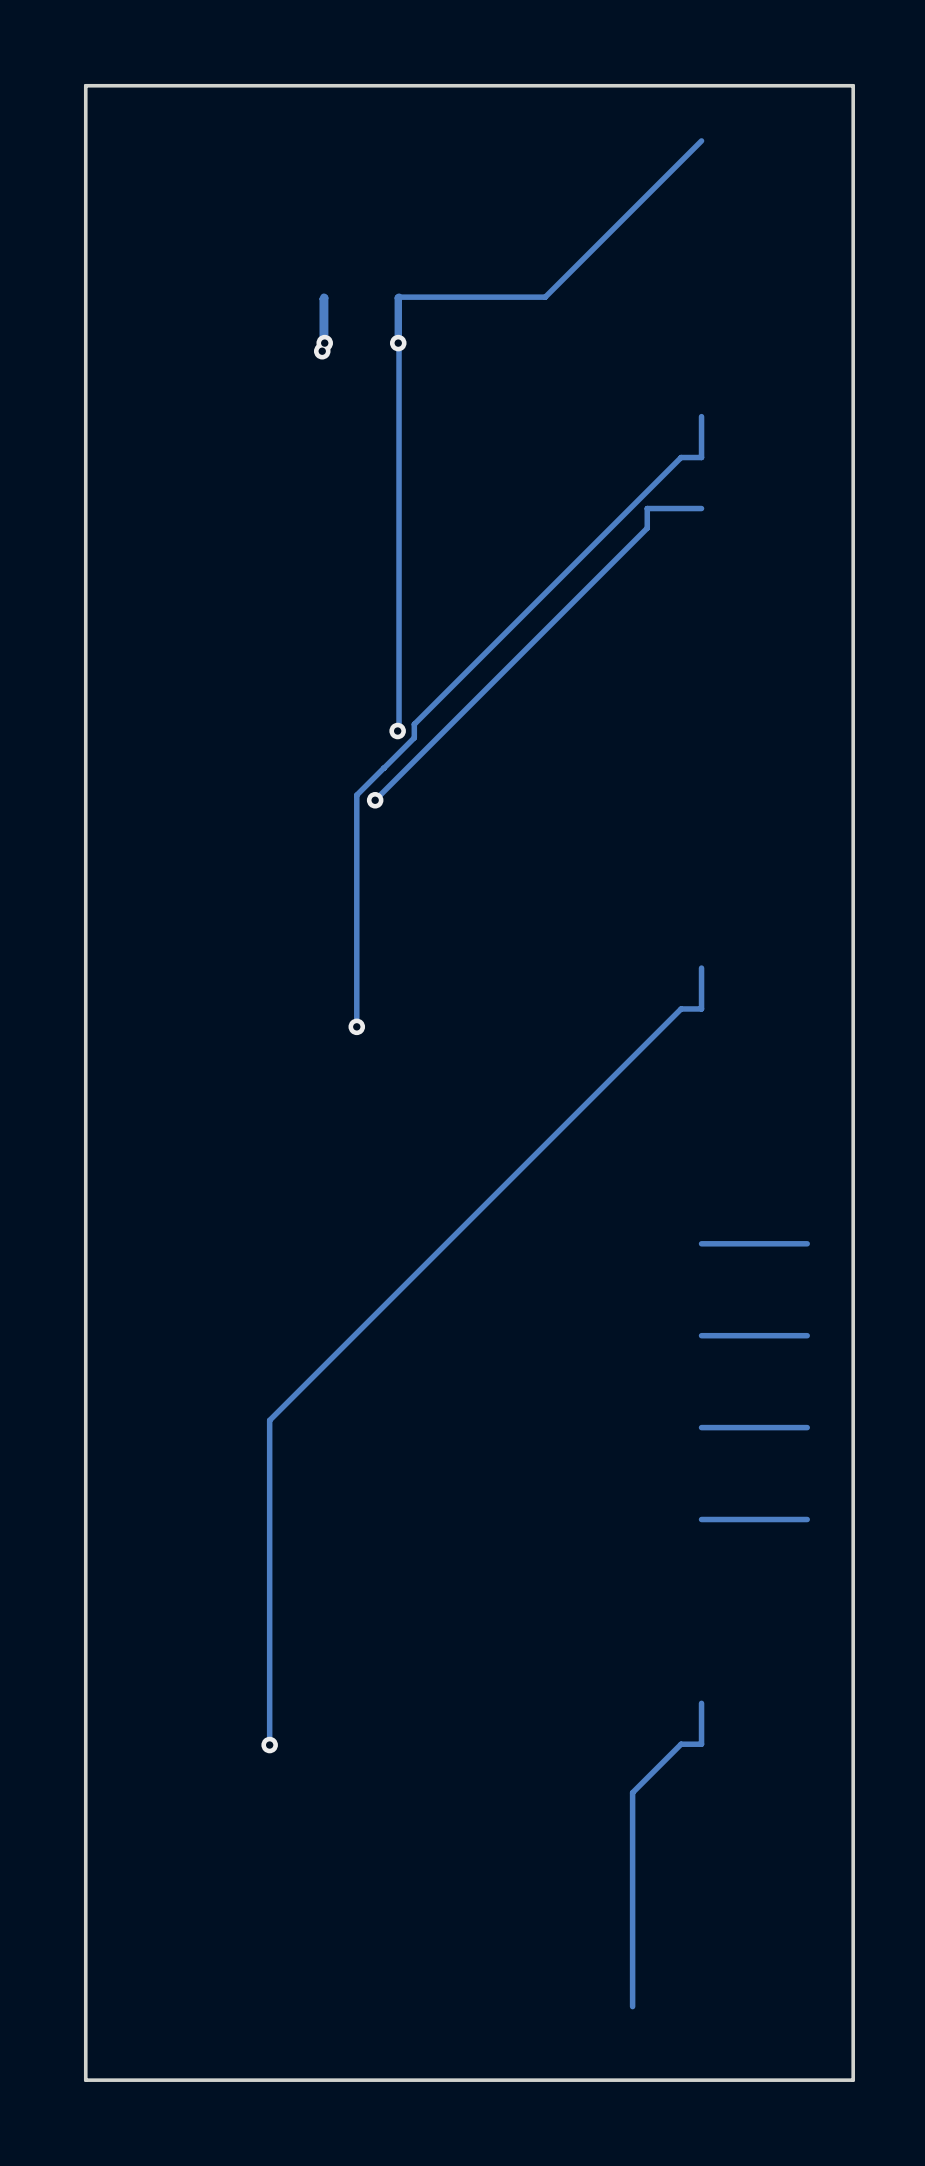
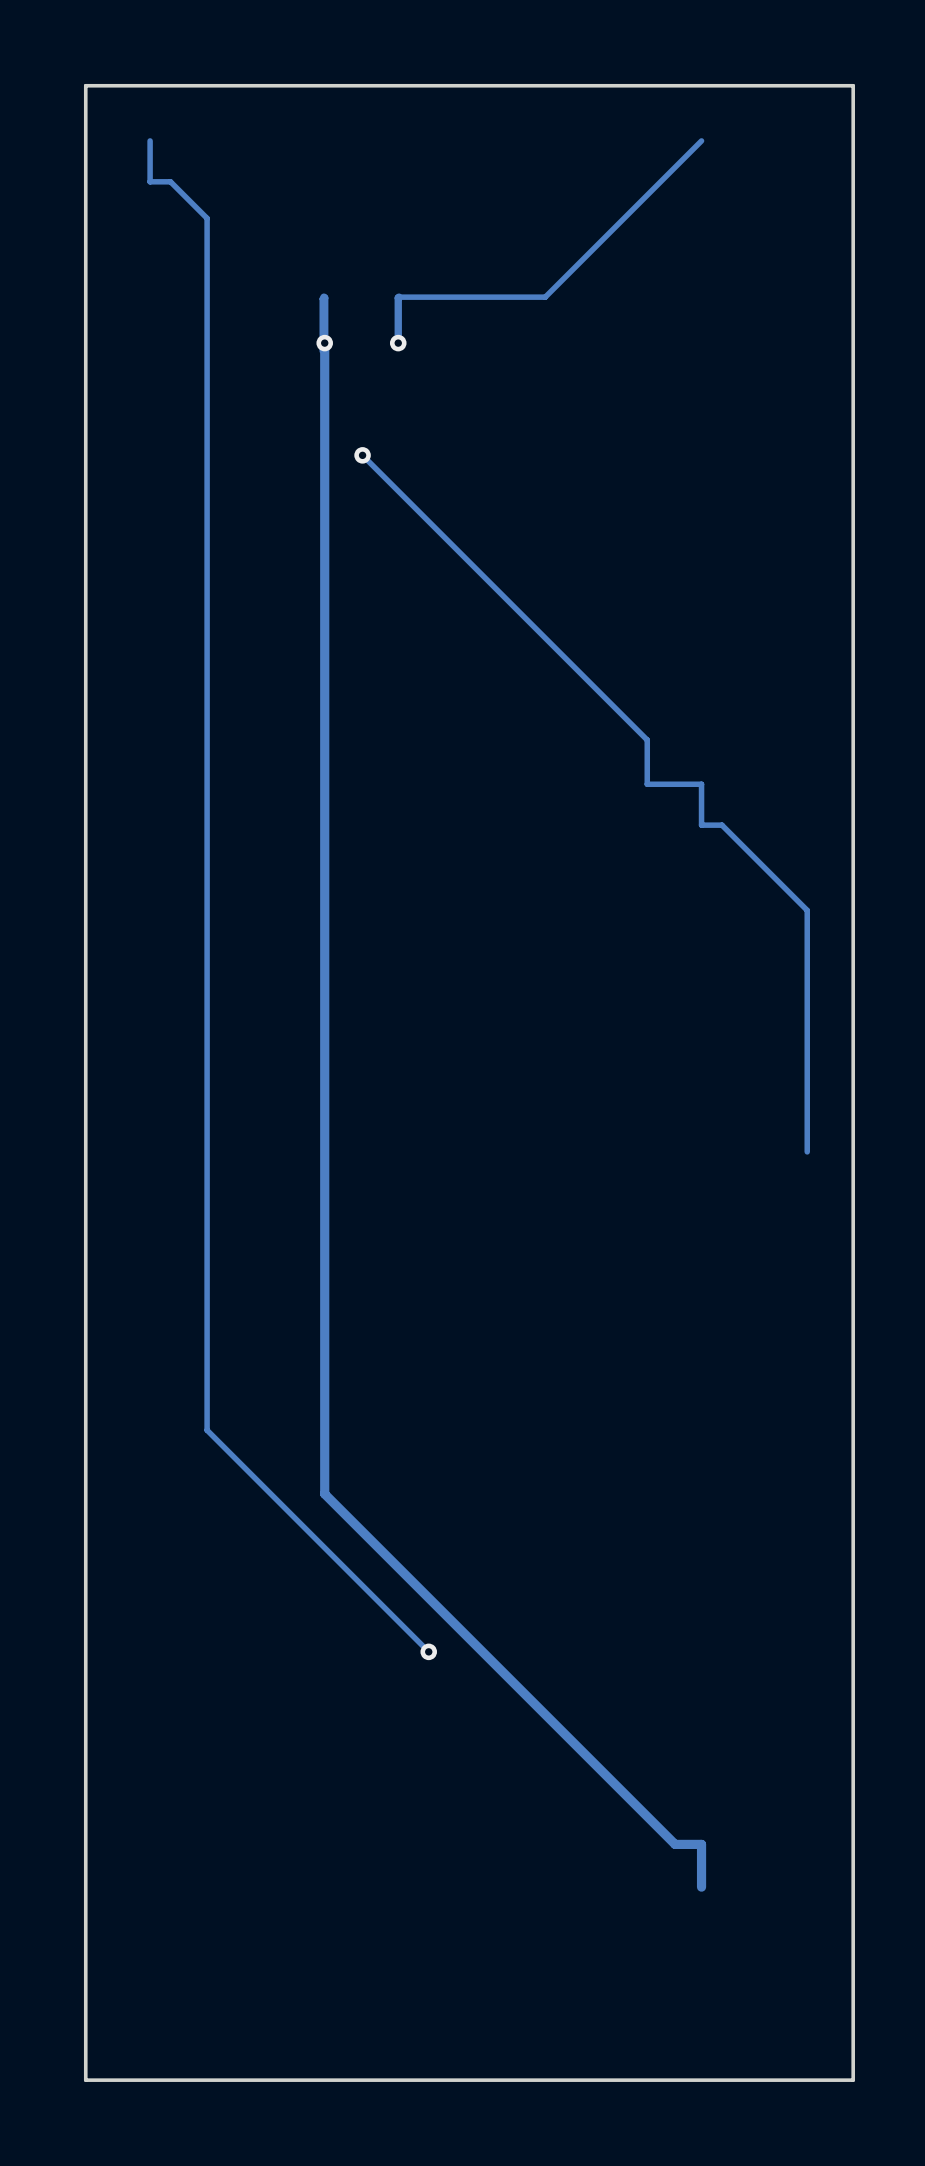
track: none -> (150, 140) (150, 181) (170, 181) (207, 218) (207, 1430) (428, 1651)
track: (399, 297) (397, 731) -> none
track: none -> (324, 343) (324, 1493) (675, 1844) (701, 1844) (701, 1887)
via position: (322, 351) -> (362, 455)
track: (701, 416) (701, 457) (681, 457) (414, 724) (414, 737) (356, 795) (356, 1026) -> none
track: none -> (362, 455) (647, 740) (647, 784) (701, 784) (701, 825) (721, 825) (807, 910) (807, 1151)
track: (701, 508) (647, 508) (647, 528) (375, 800) -> none
via: (397, 731) -> none
via: (375, 800) -> none
track: (701, 968) (701, 1008) (681, 1008) (269, 1420) (269, 1745) -> none
via: (356, 1026) -> none
track: (807, 1243) (701, 1243) -> none
track: (807, 1335) (701, 1335) -> none
track: (807, 1427) (701, 1427) -> none
track: (807, 1519) (701, 1519) -> none
track: (701, 1703) (701, 1744) (681, 1744) (632, 1792) (632, 2006) -> none
via position: (269, 1745) -> (428, 1651)

